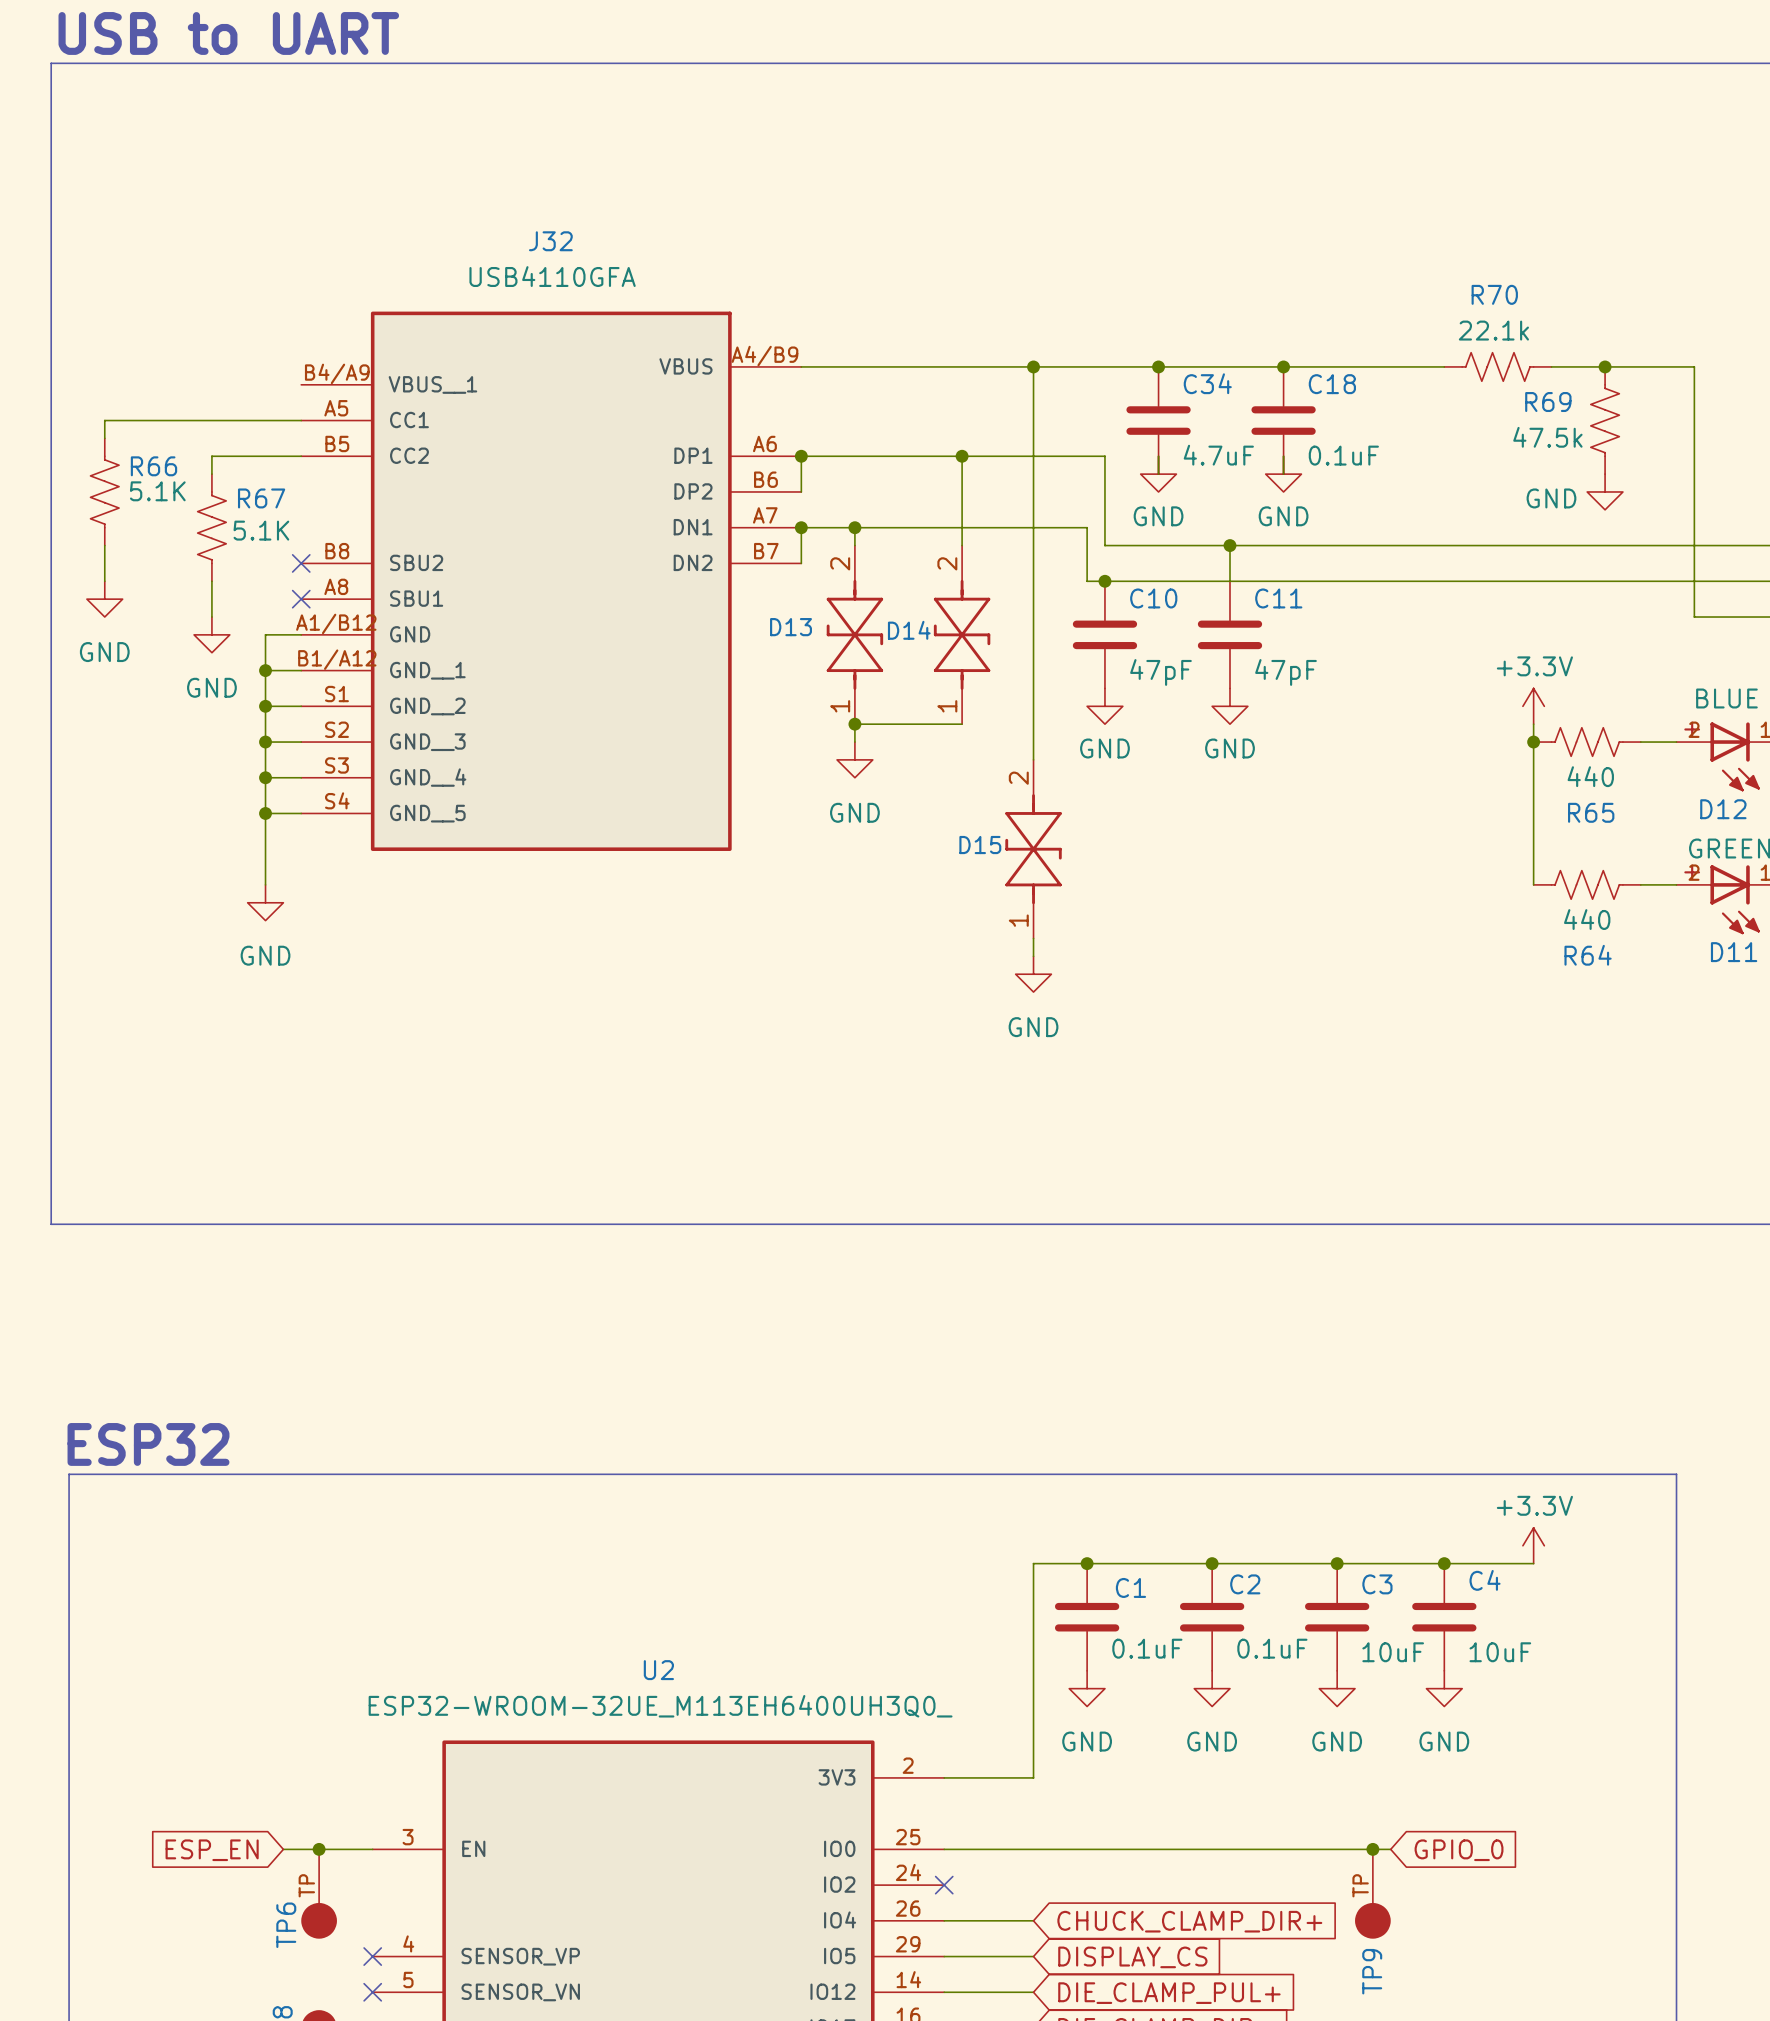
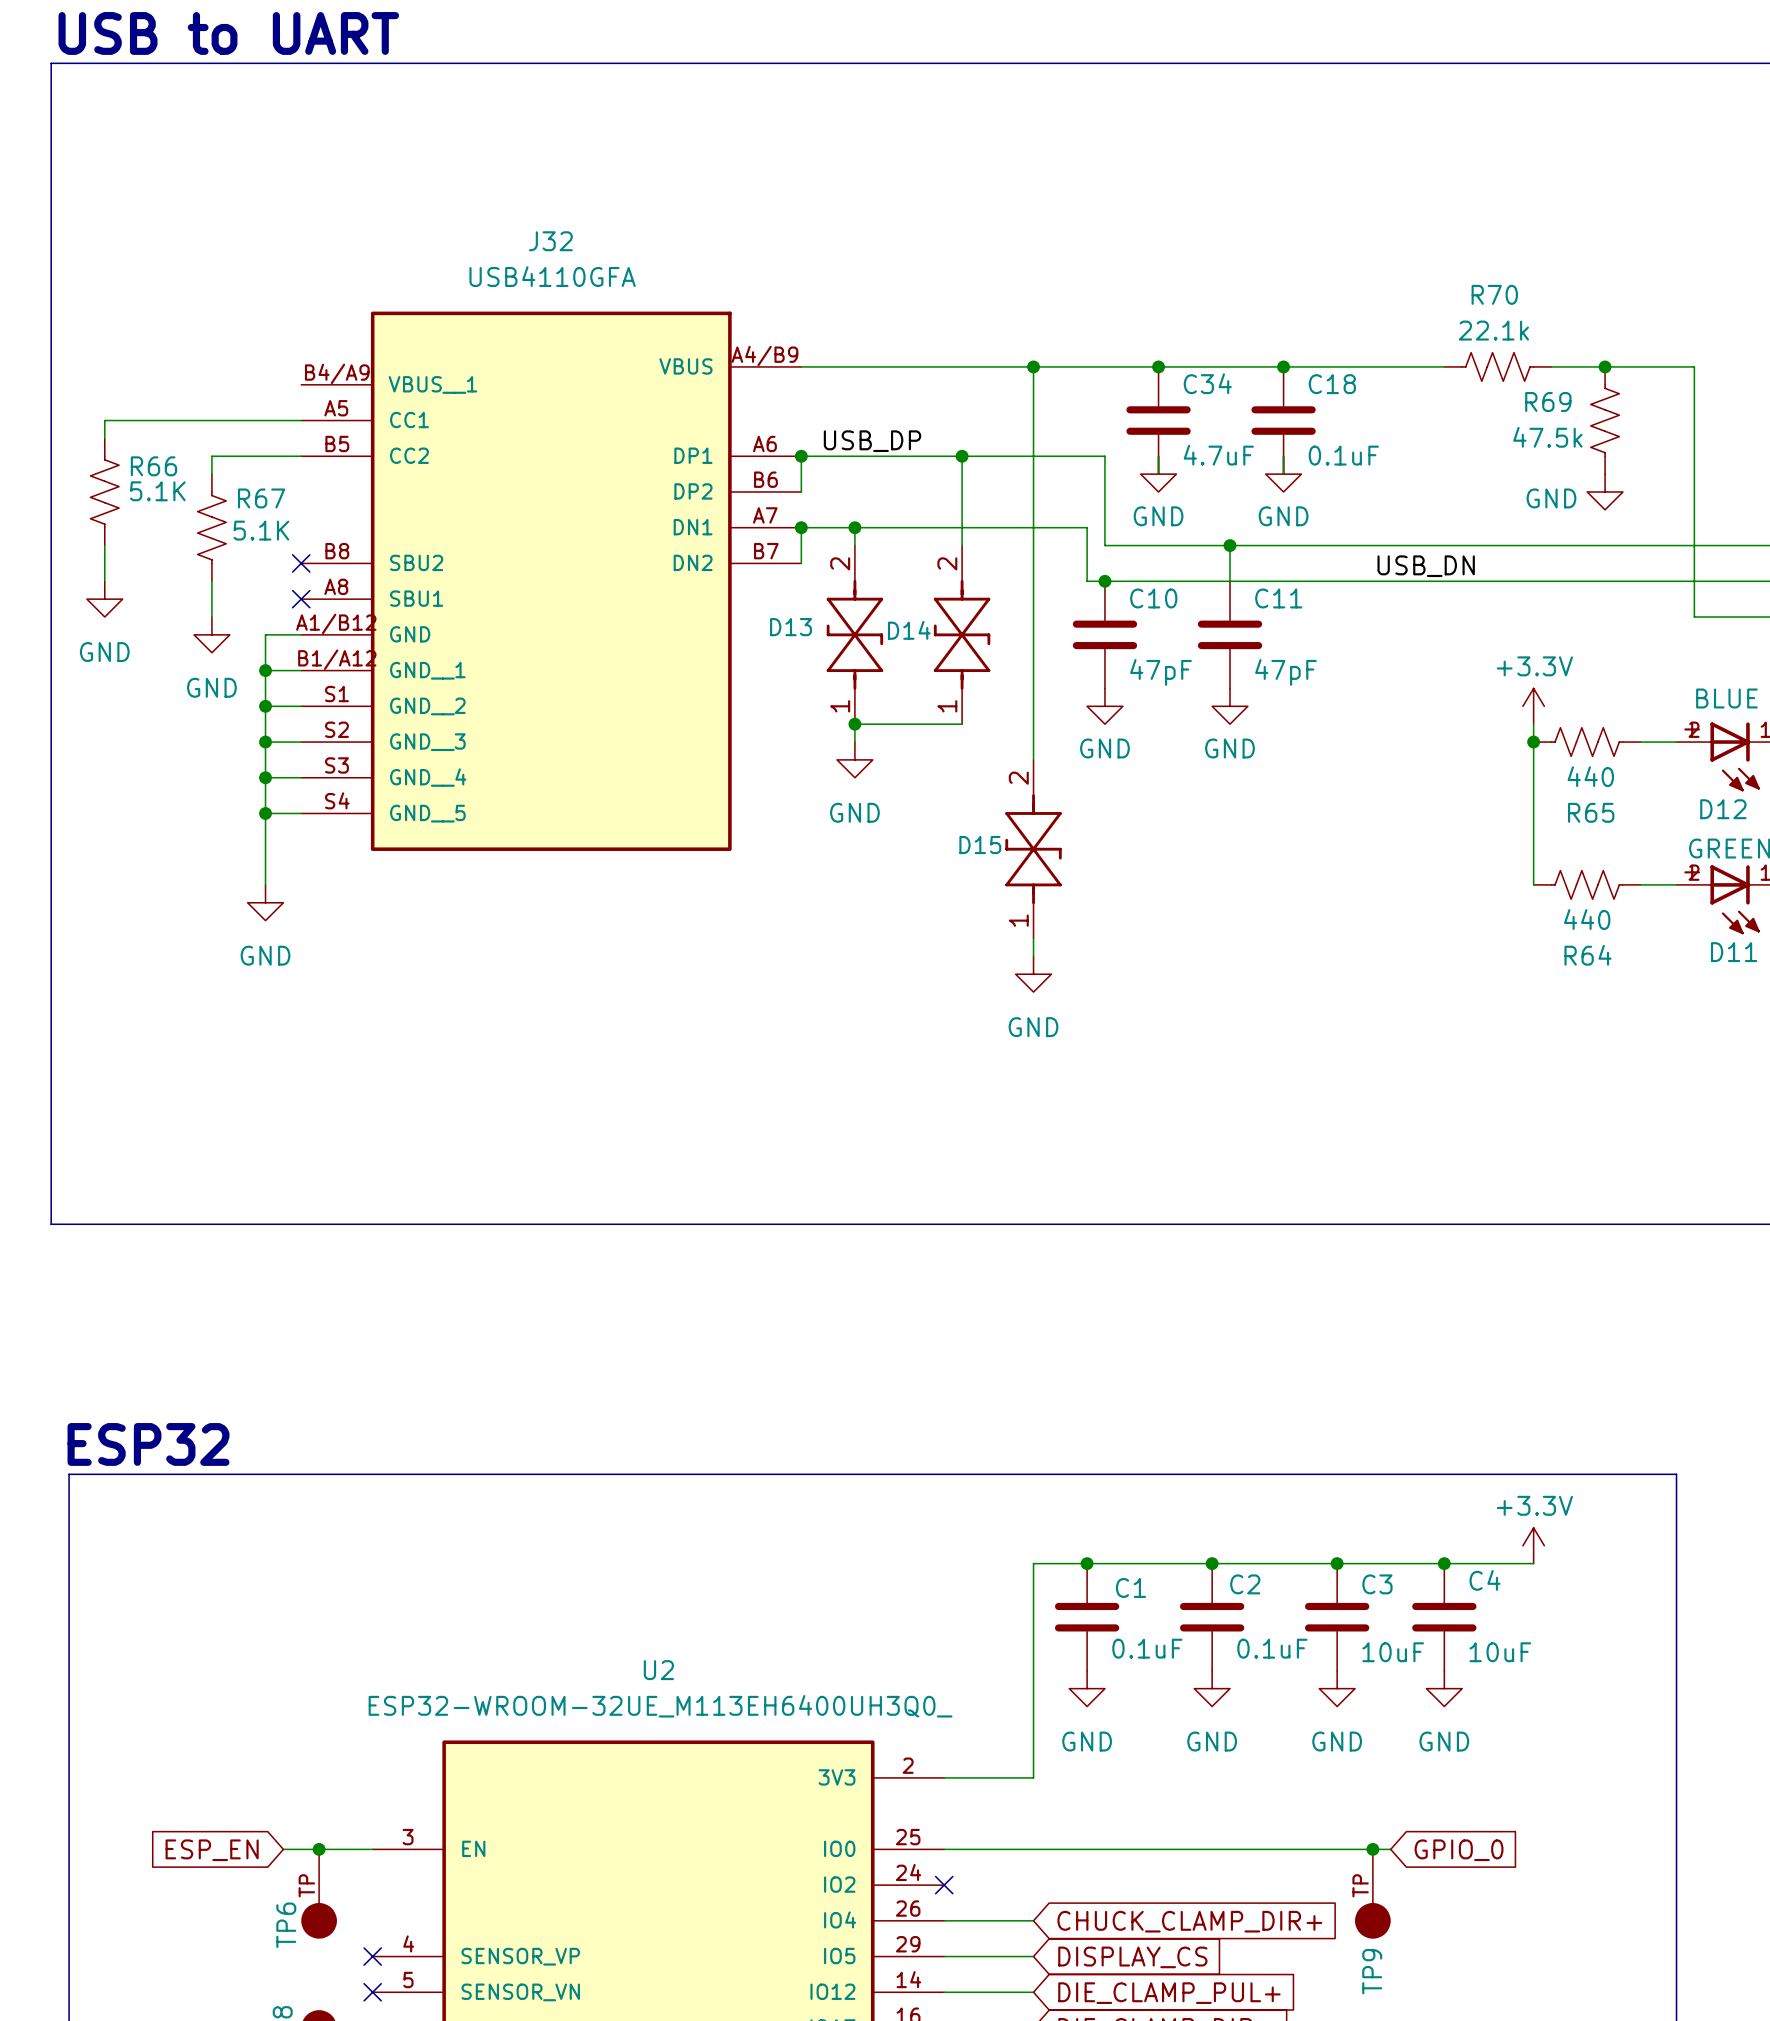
label: none -> USB_DP (872, 441)
label: none -> USB_DN (1426, 566)

